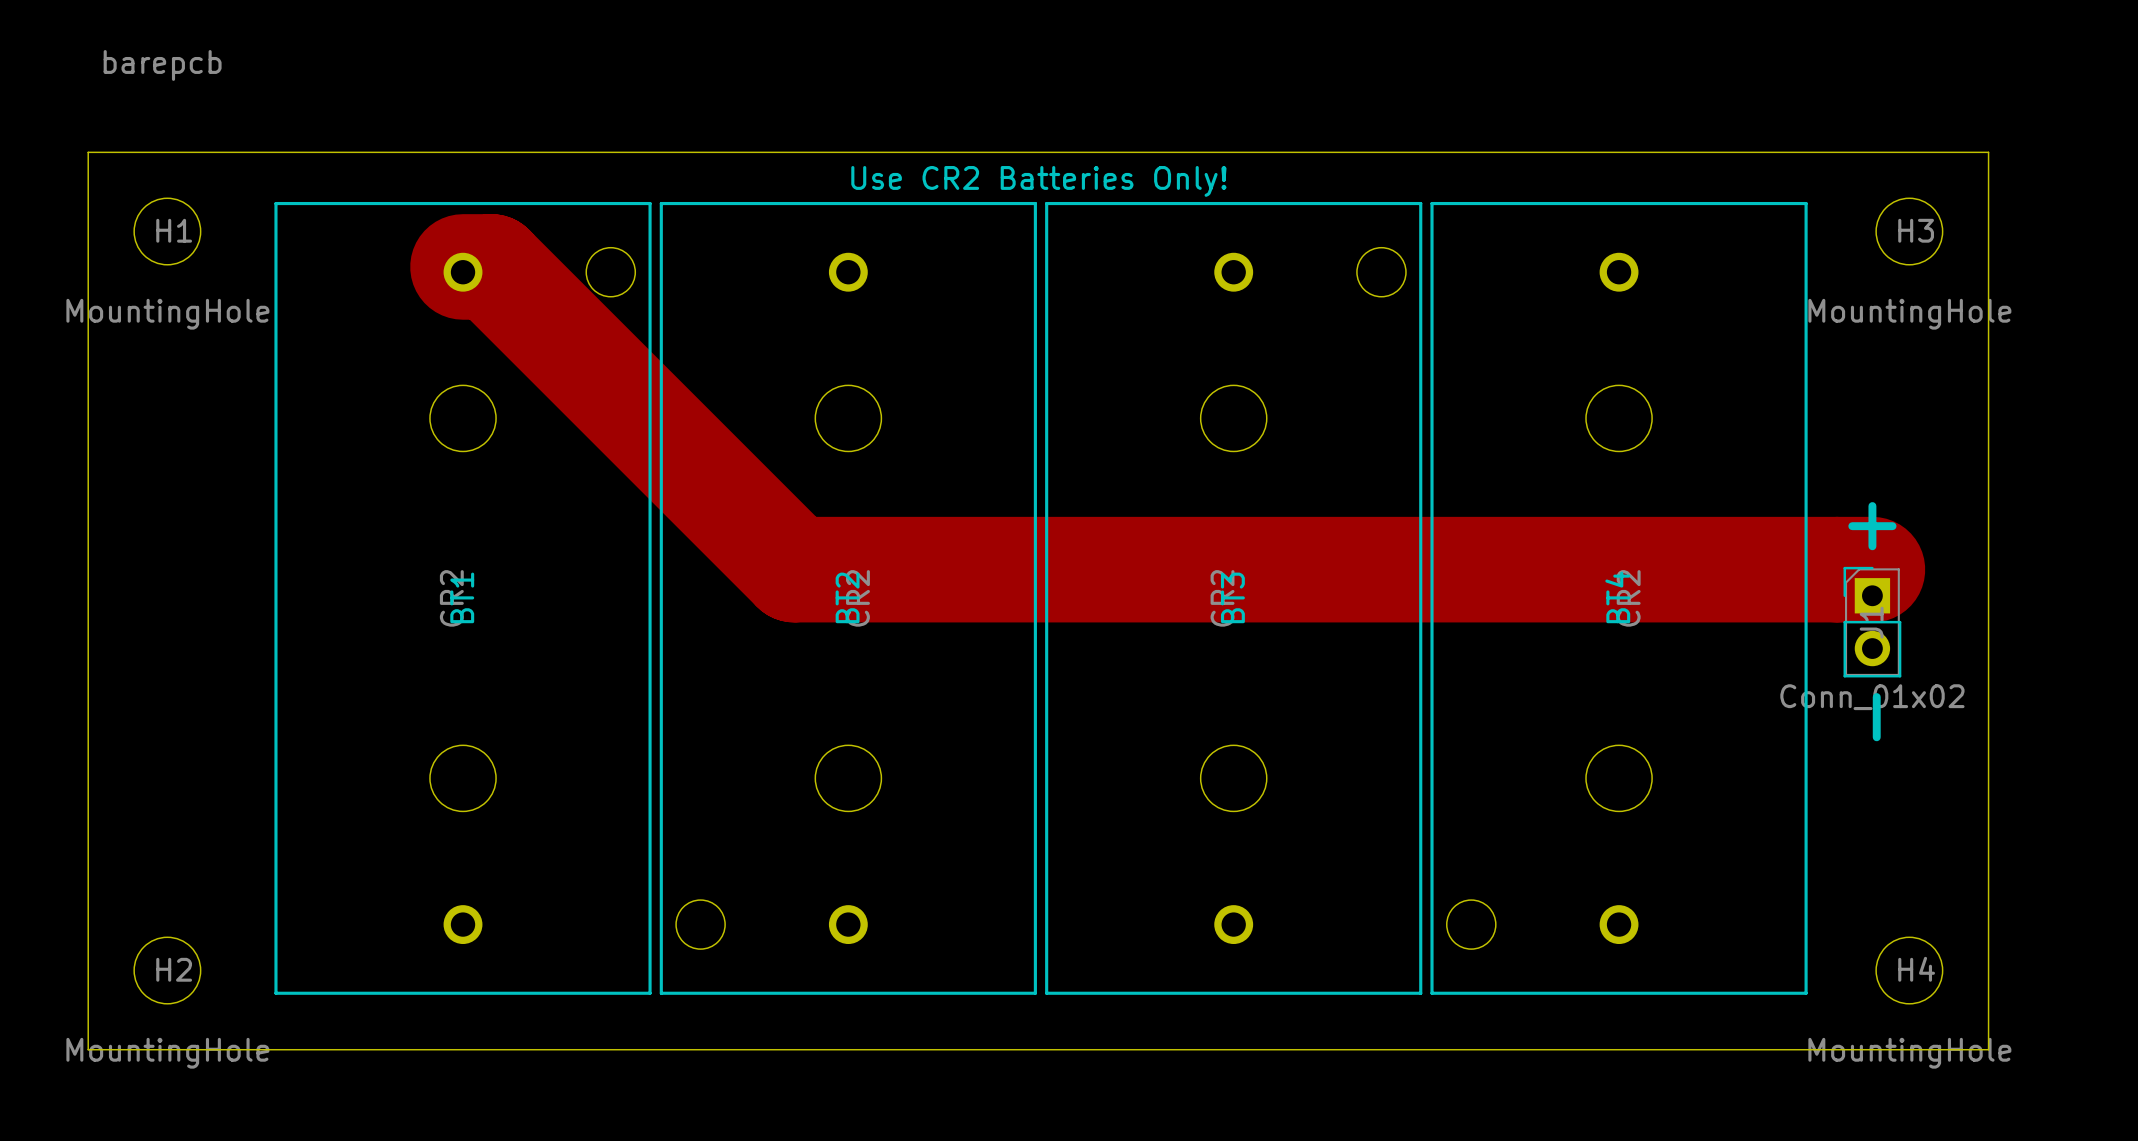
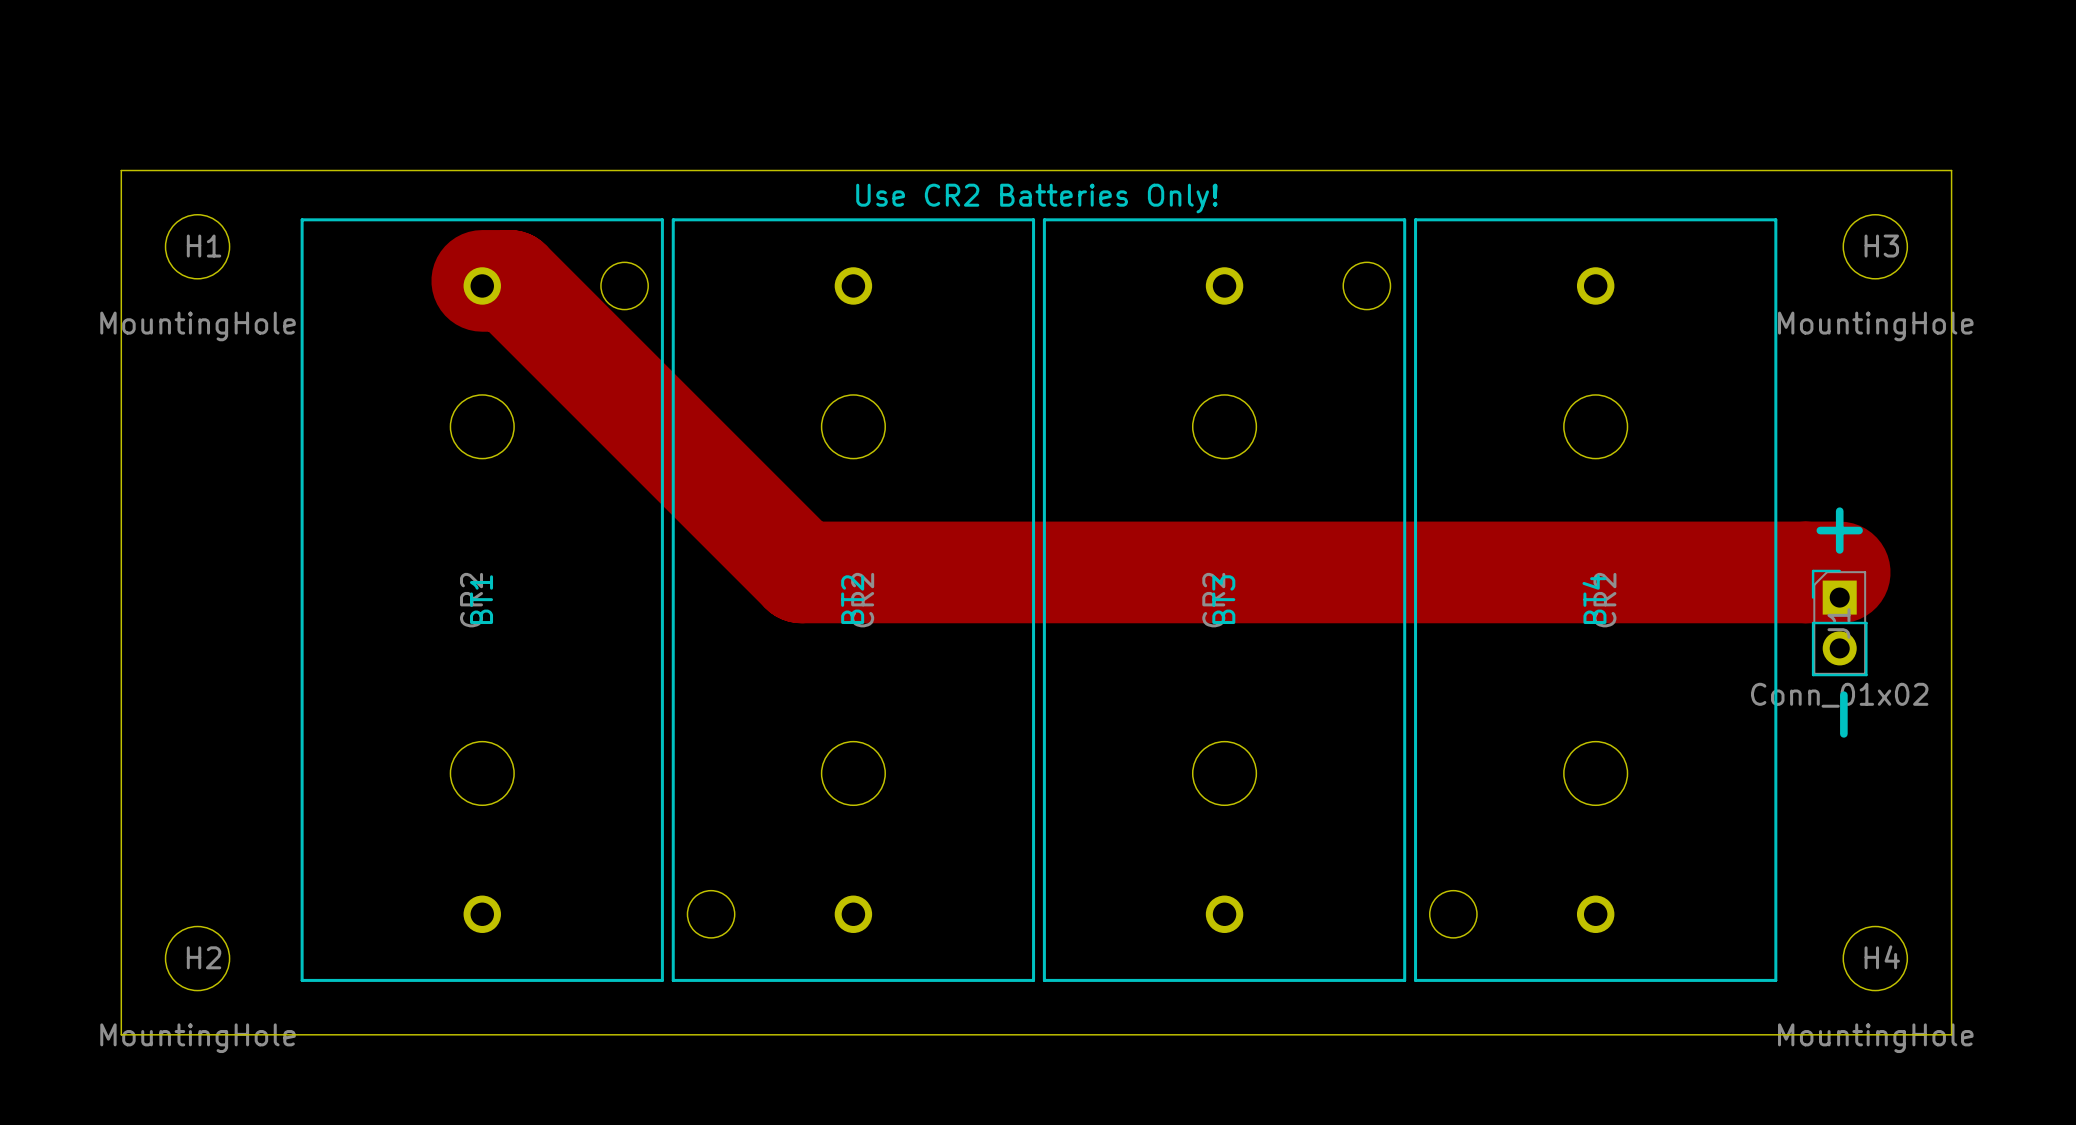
drawing: [103, 50, 222, 81] -> none

